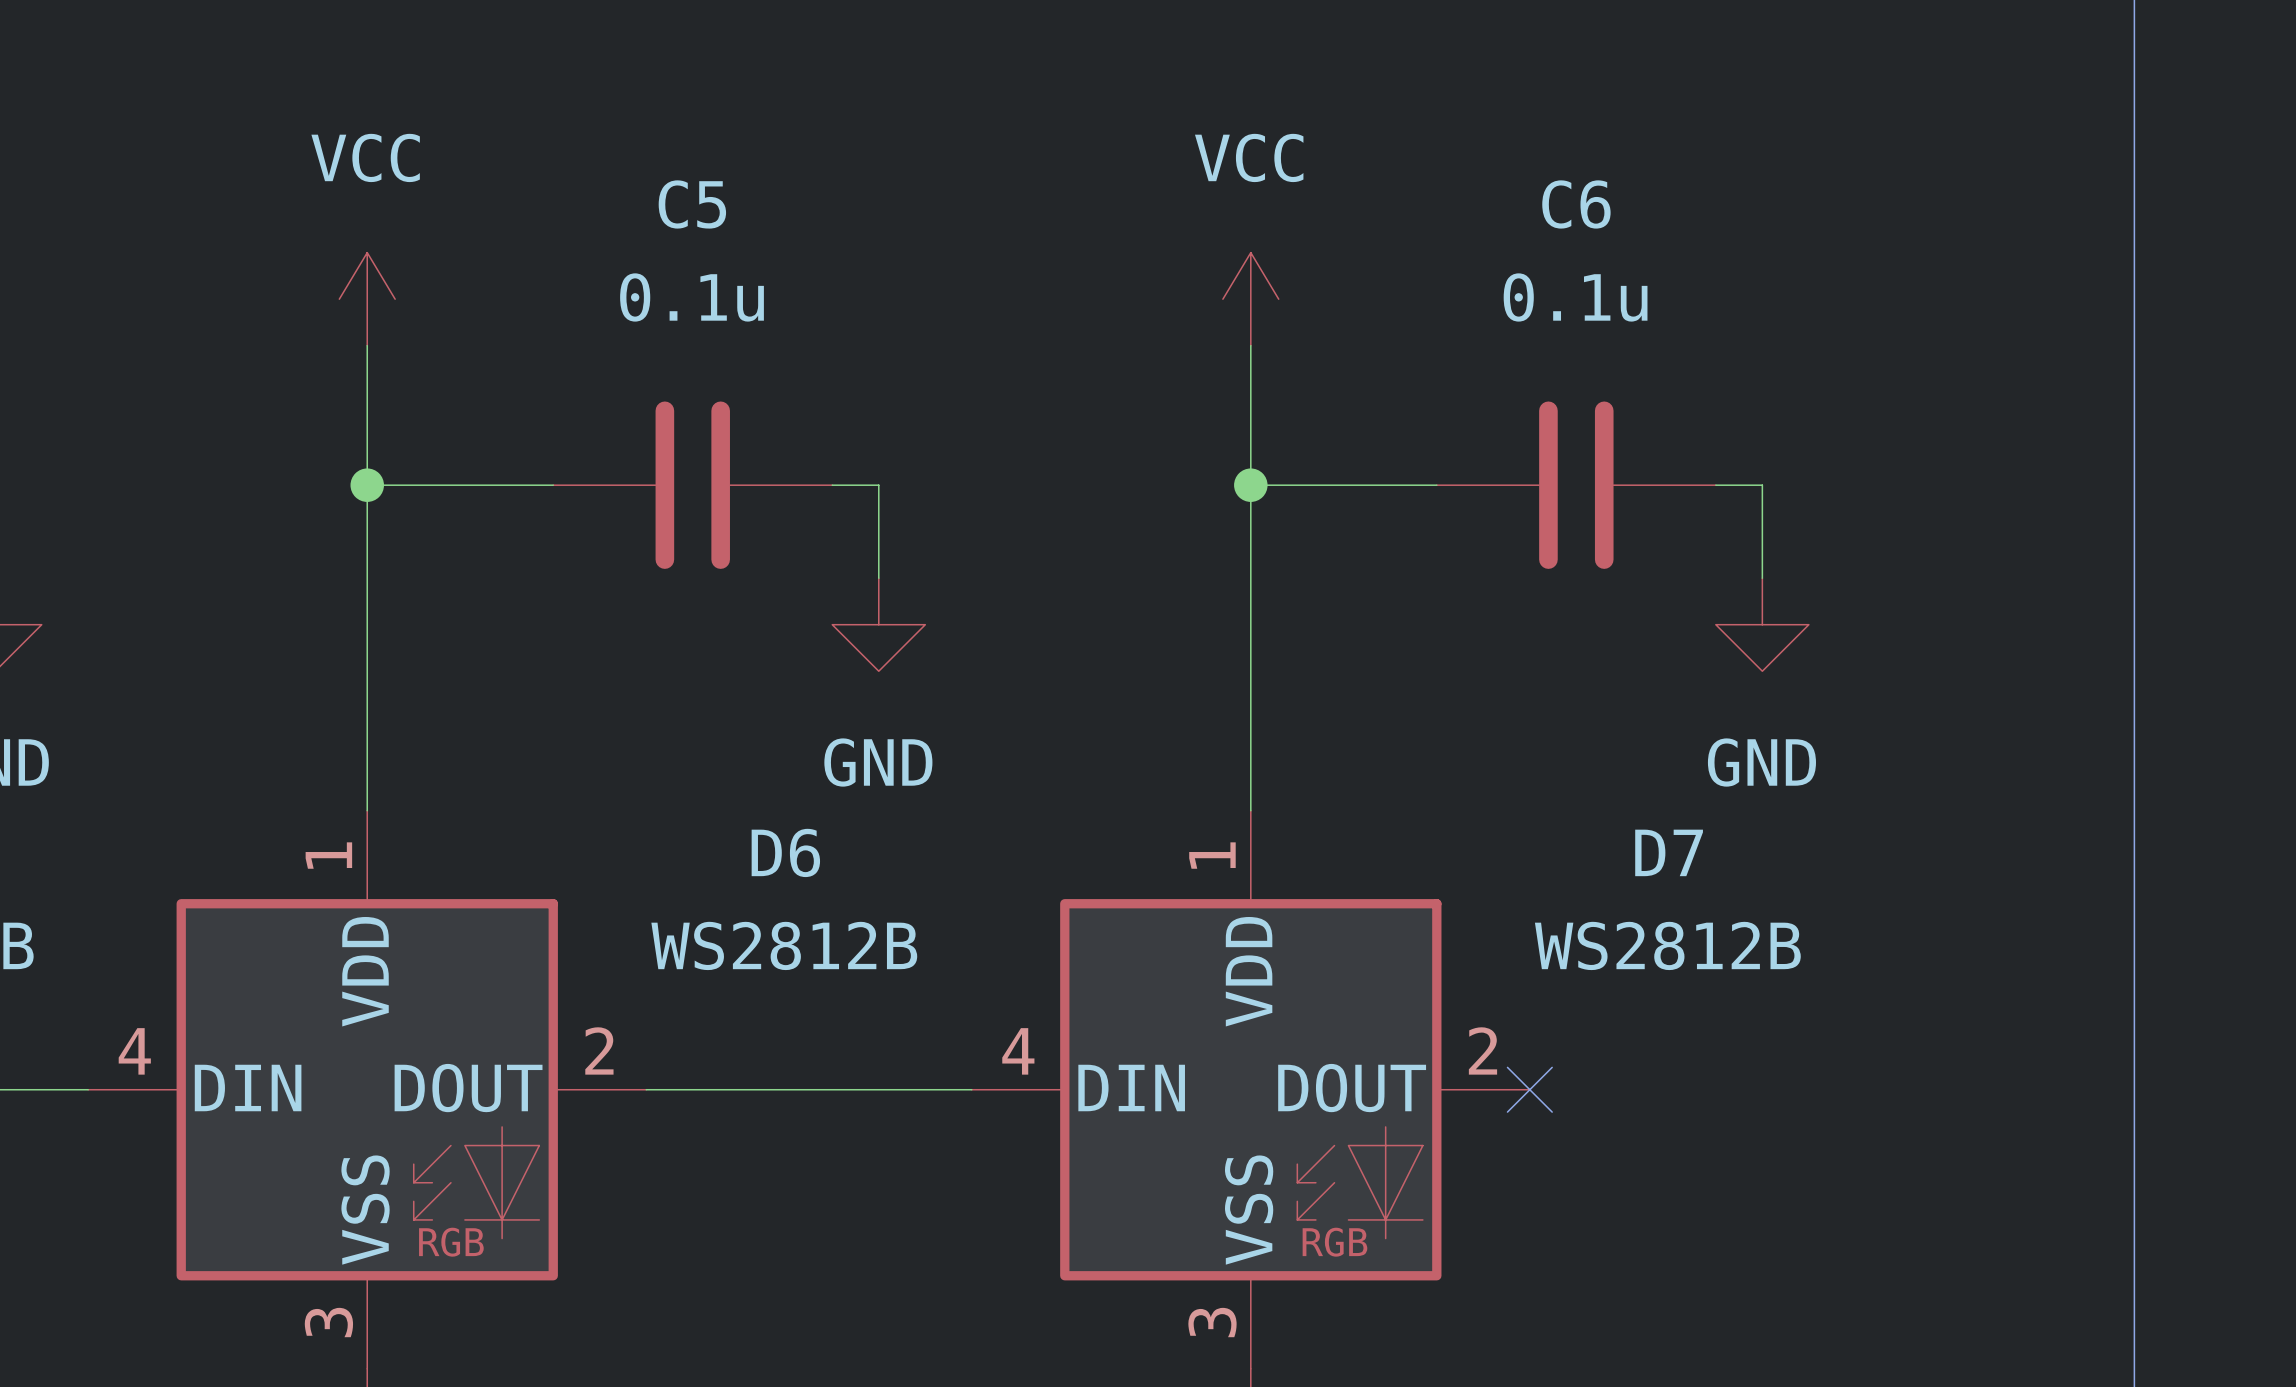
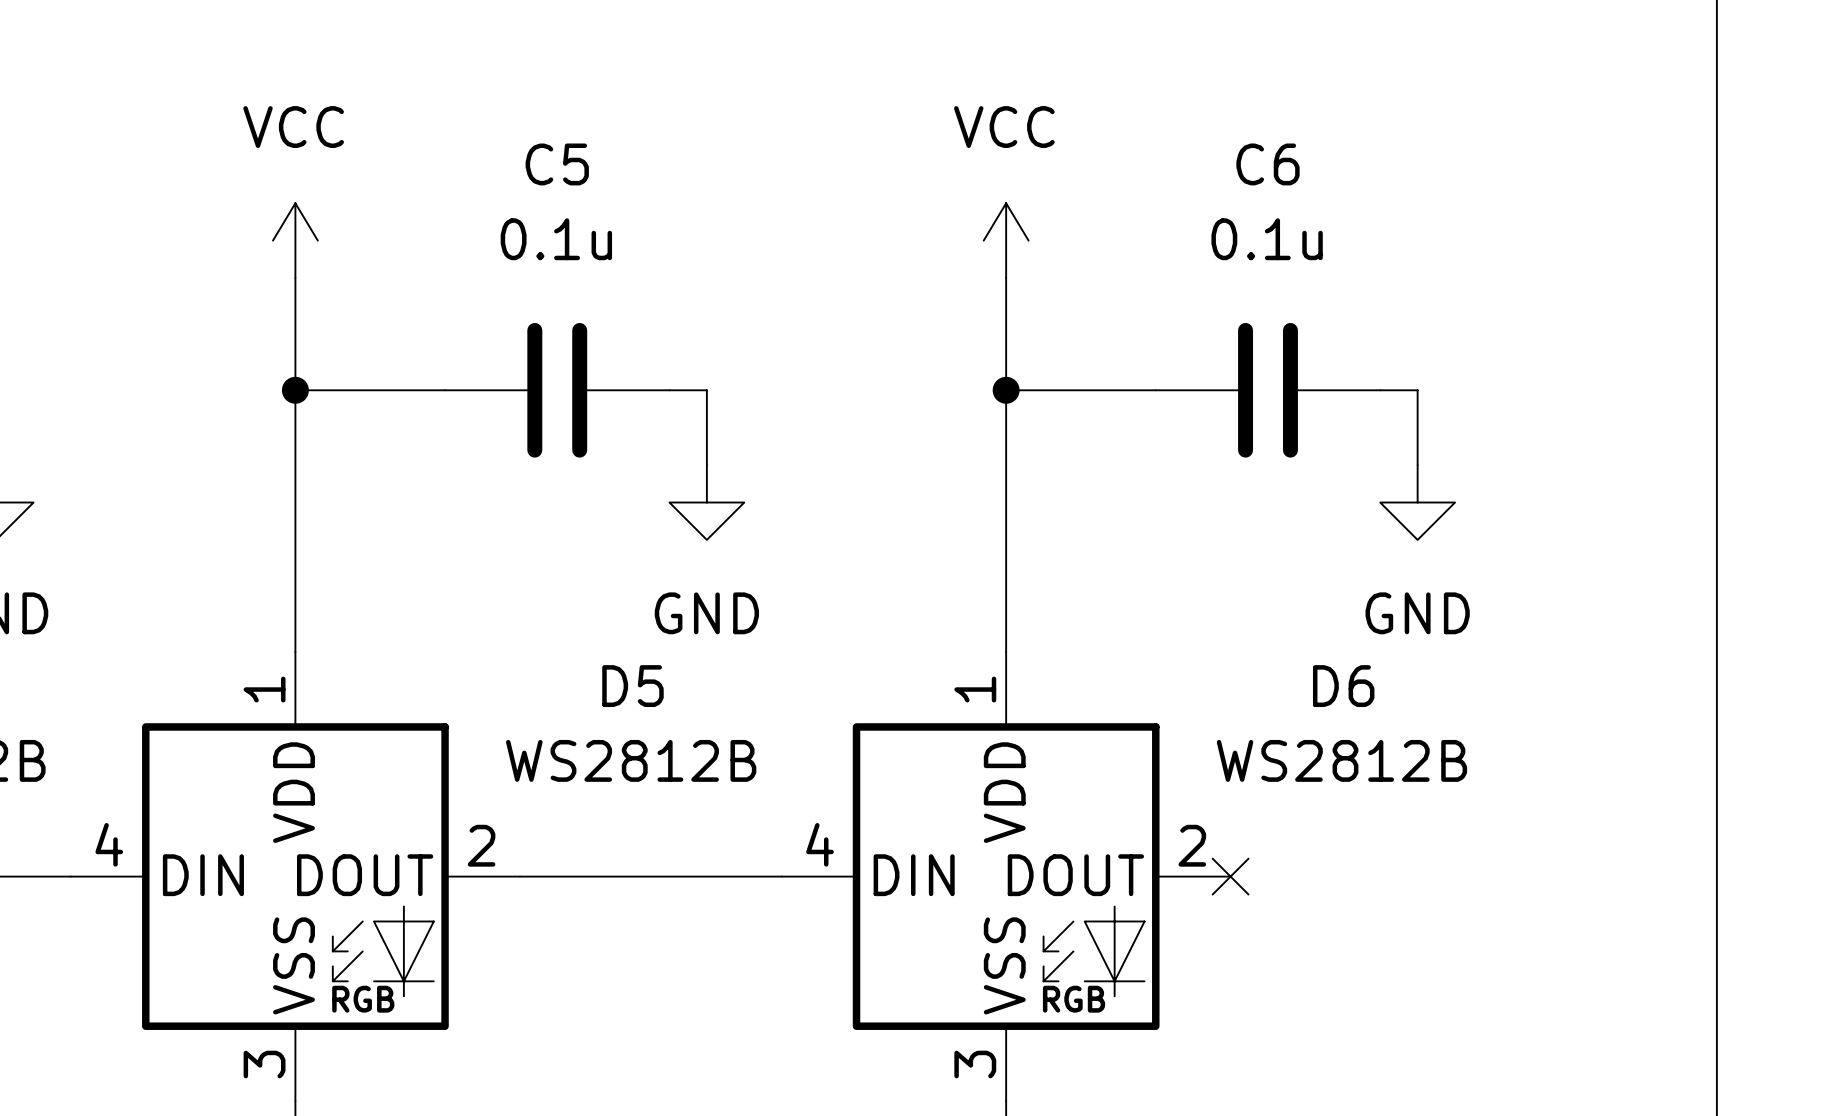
D6 name: D6 (785, 852) -> D5 (632, 686)
D7 name: D7 (1669, 852) -> D6 (1343, 686)

